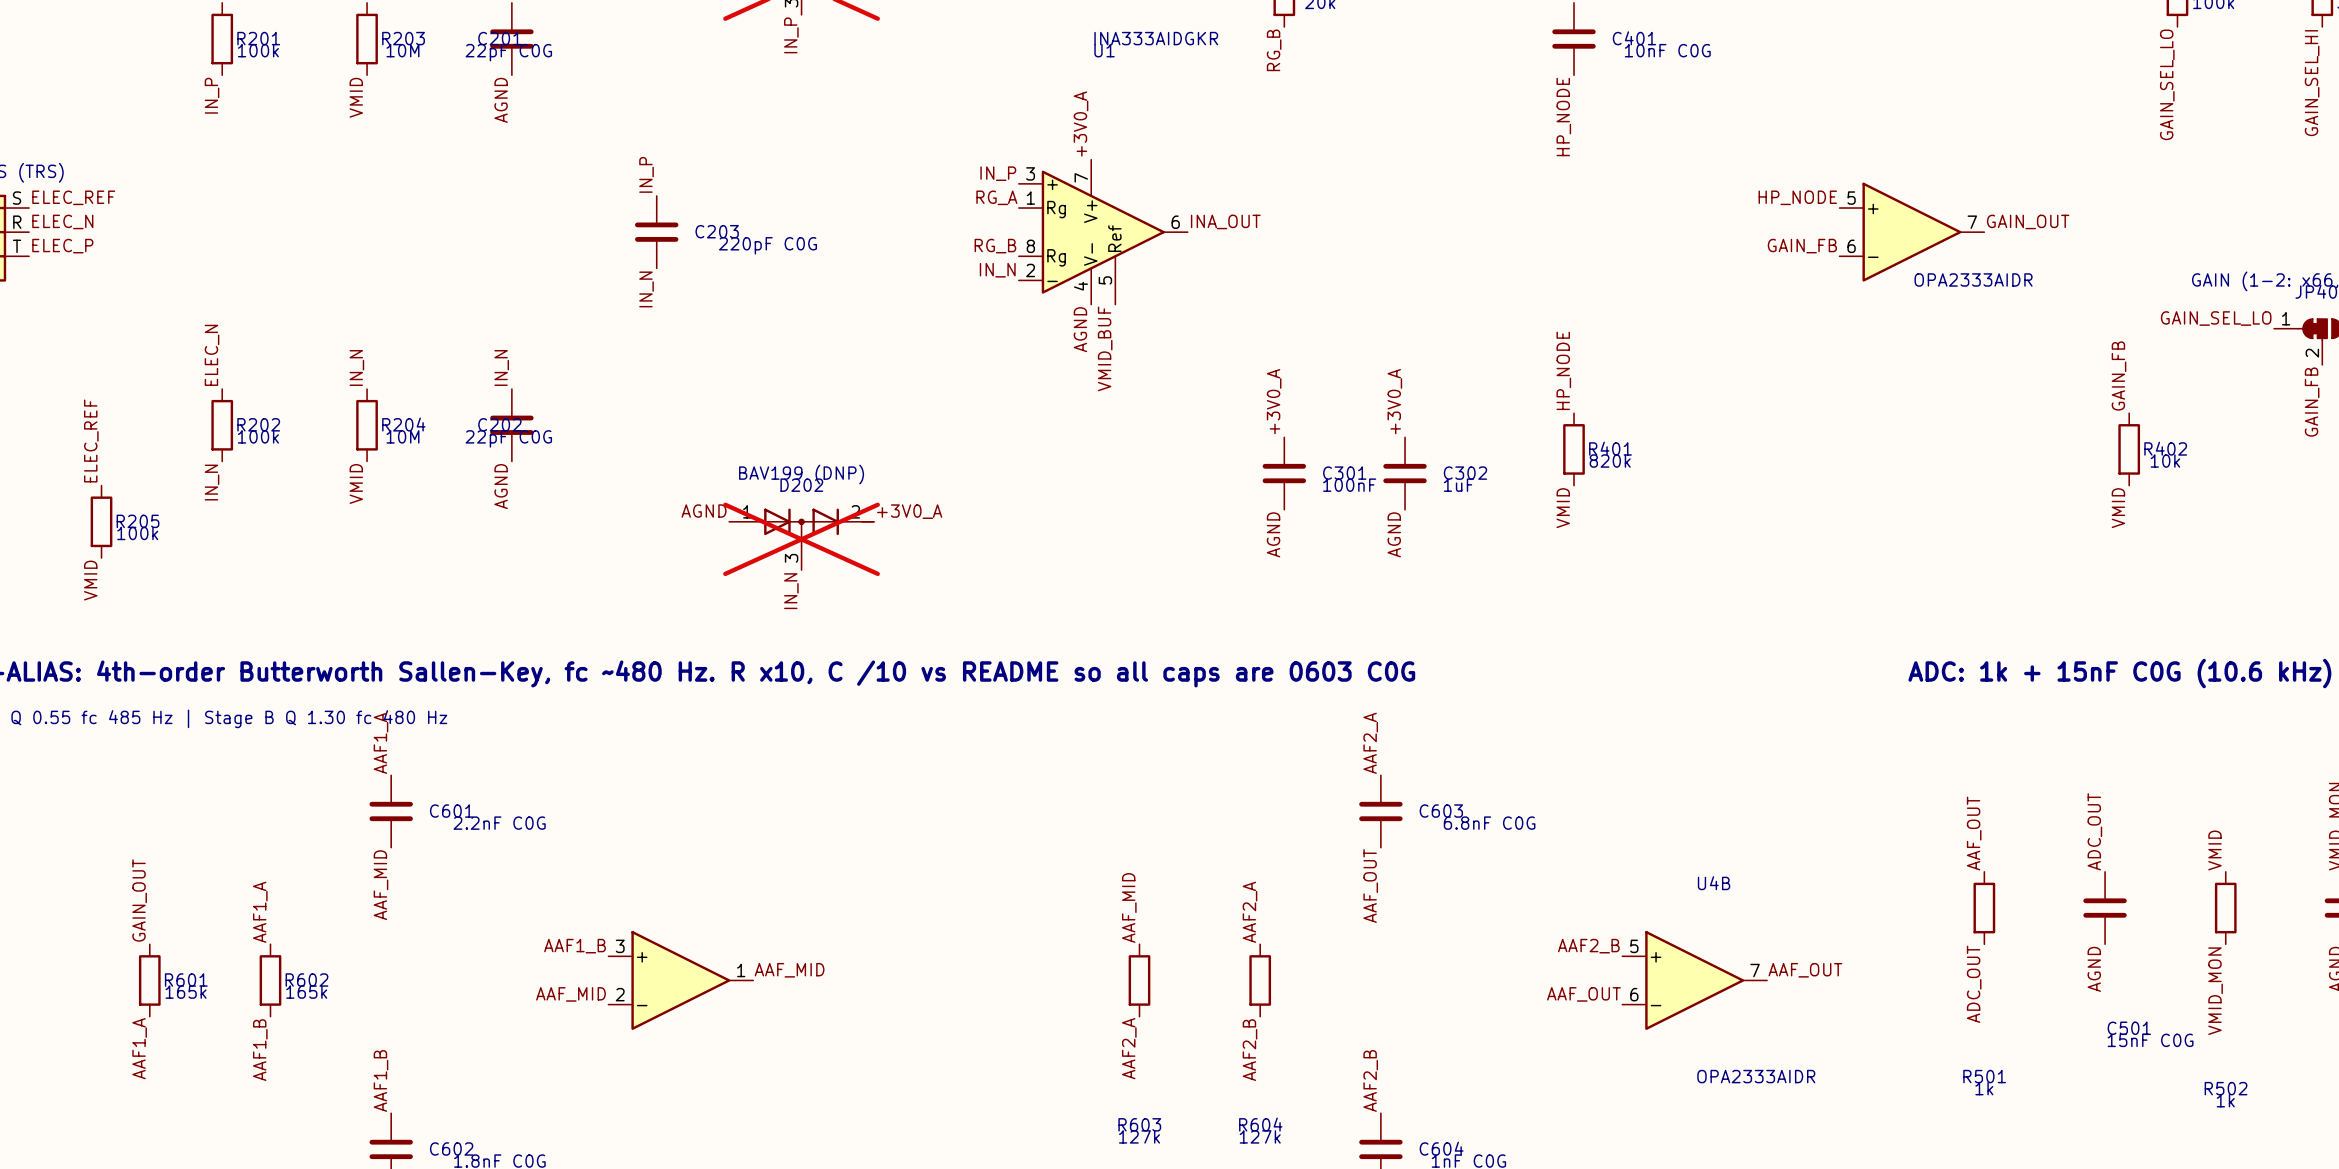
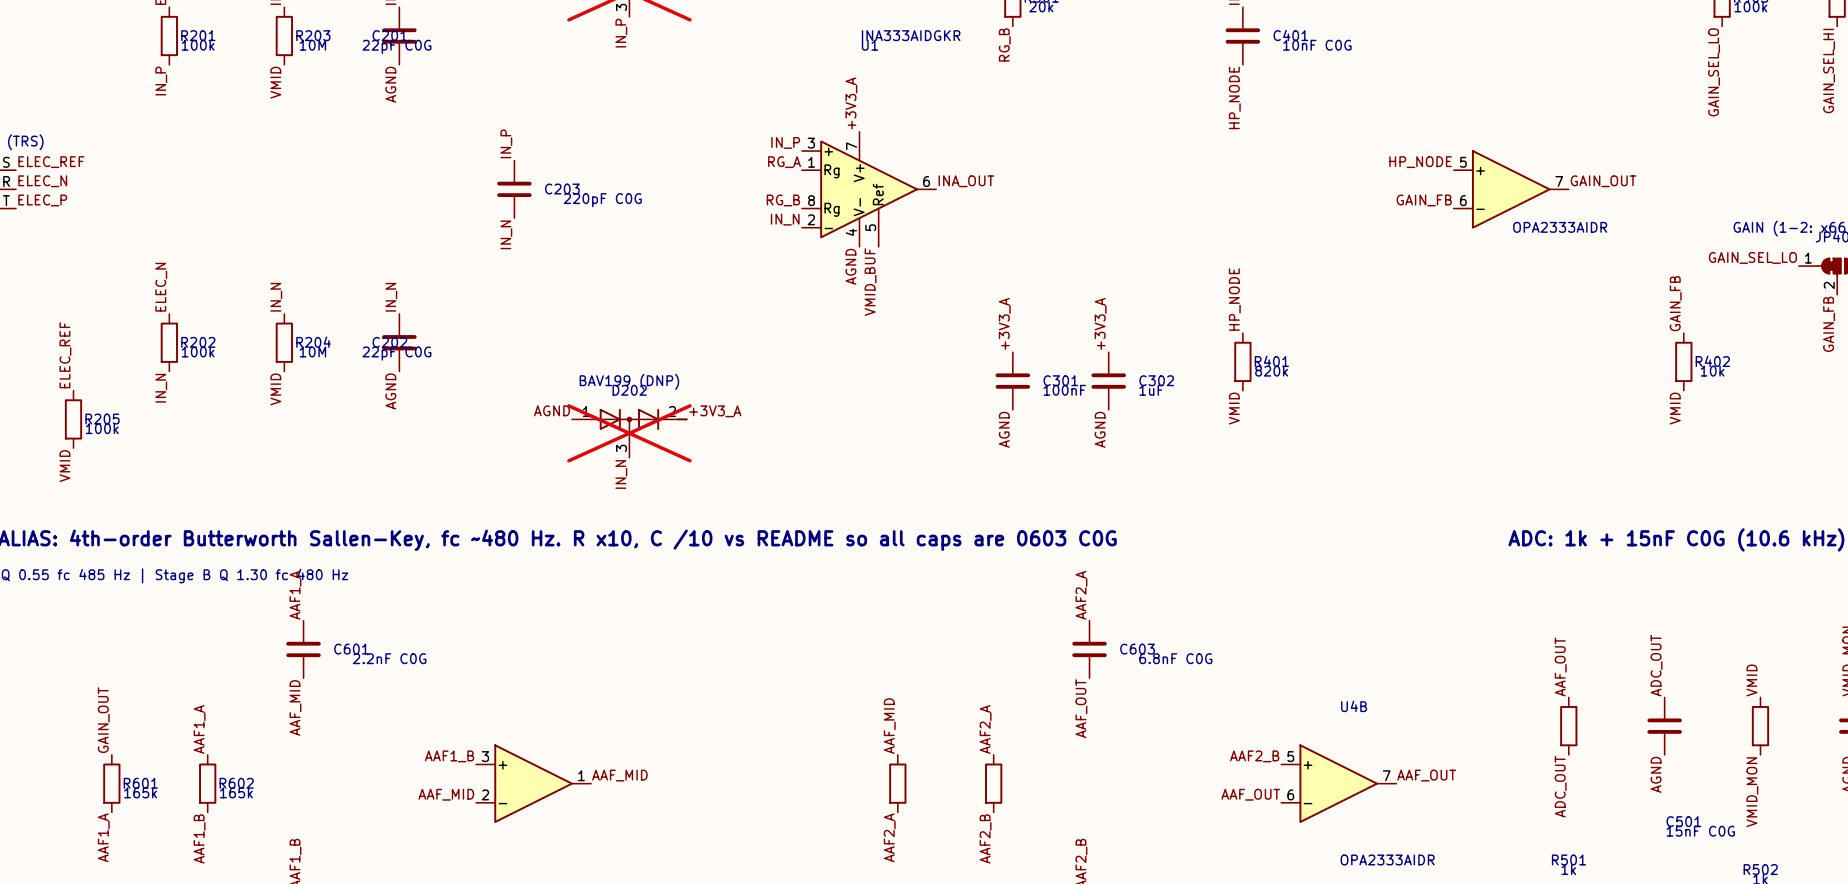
label: +3V0_A (1081, 124) -> +3V3_A (851, 103)
label: +3V0_A (1274, 401) -> +3V3_A (1004, 323)
label: +3V0_A (1394, 401) -> +3V3_A (1100, 323)
label: +3V0_A (909, 511) -> +3V3_A (715, 411)

